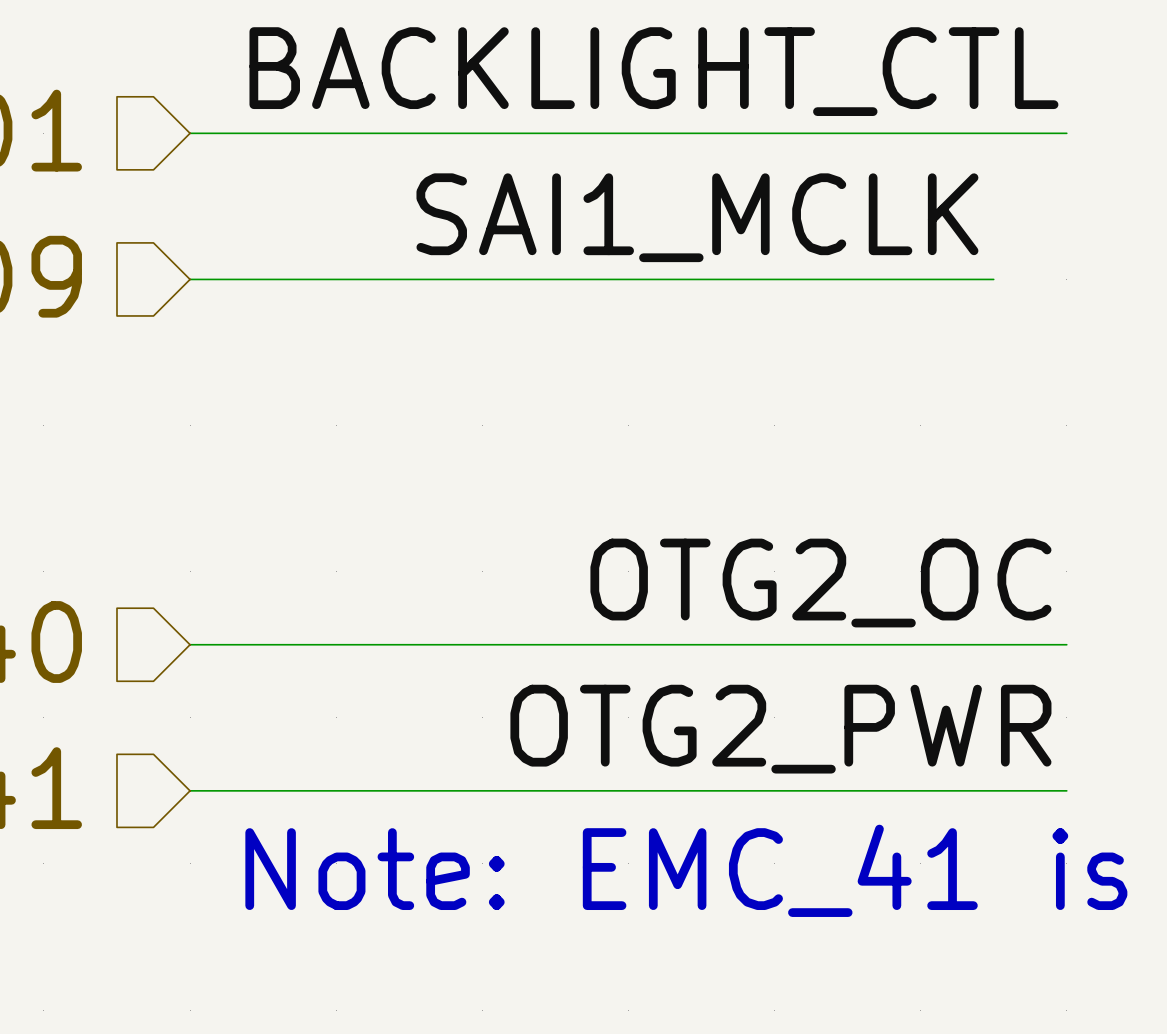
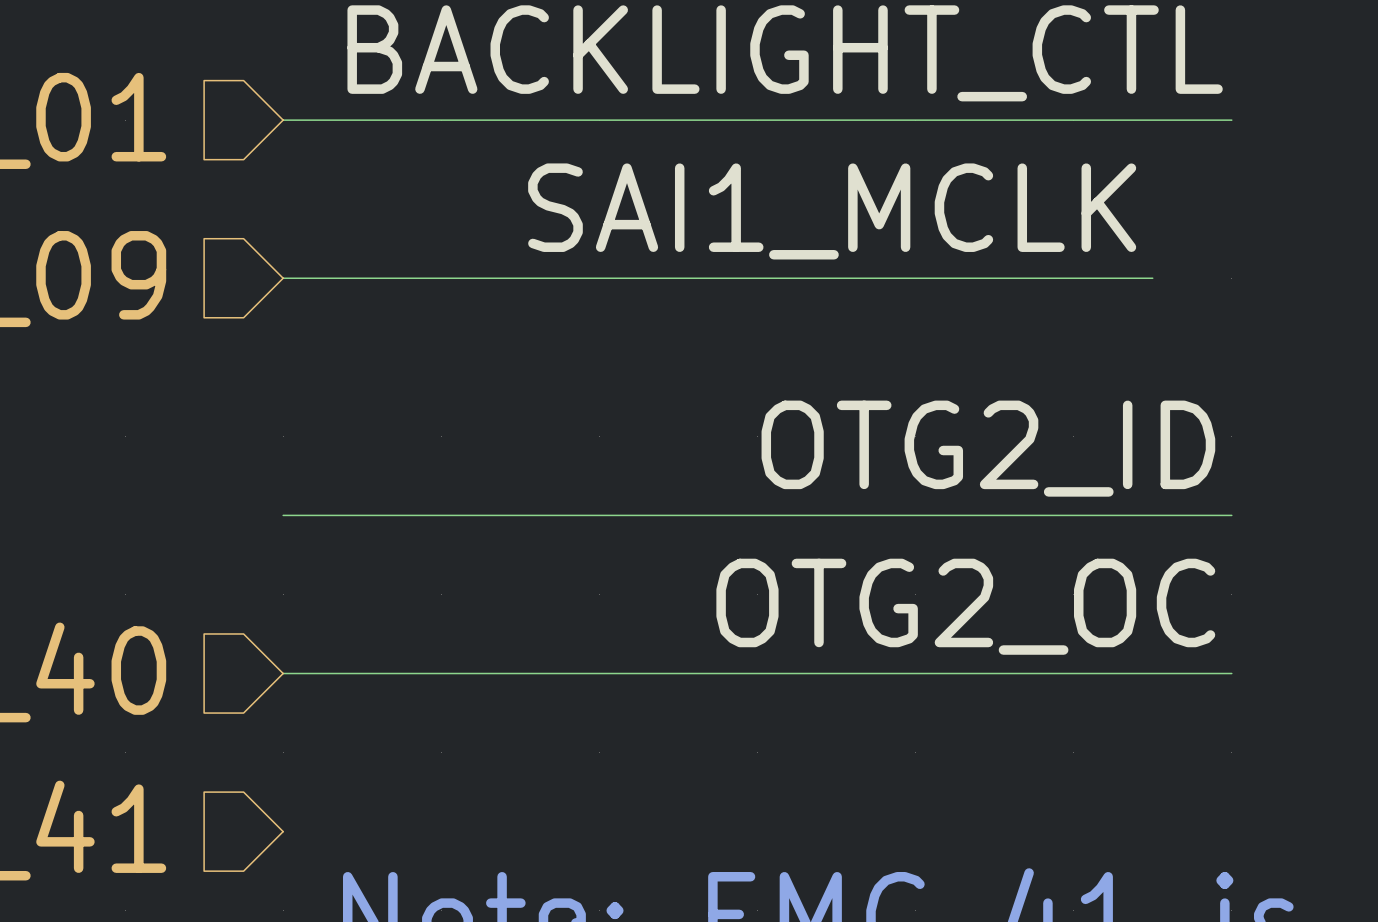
label: none -> OTG2_ID (988, 448)
label: OTG2_PWR (780, 729) -> none
wire: (190, 790) (1066, 790) -> (283, 515) (1231, 515)

